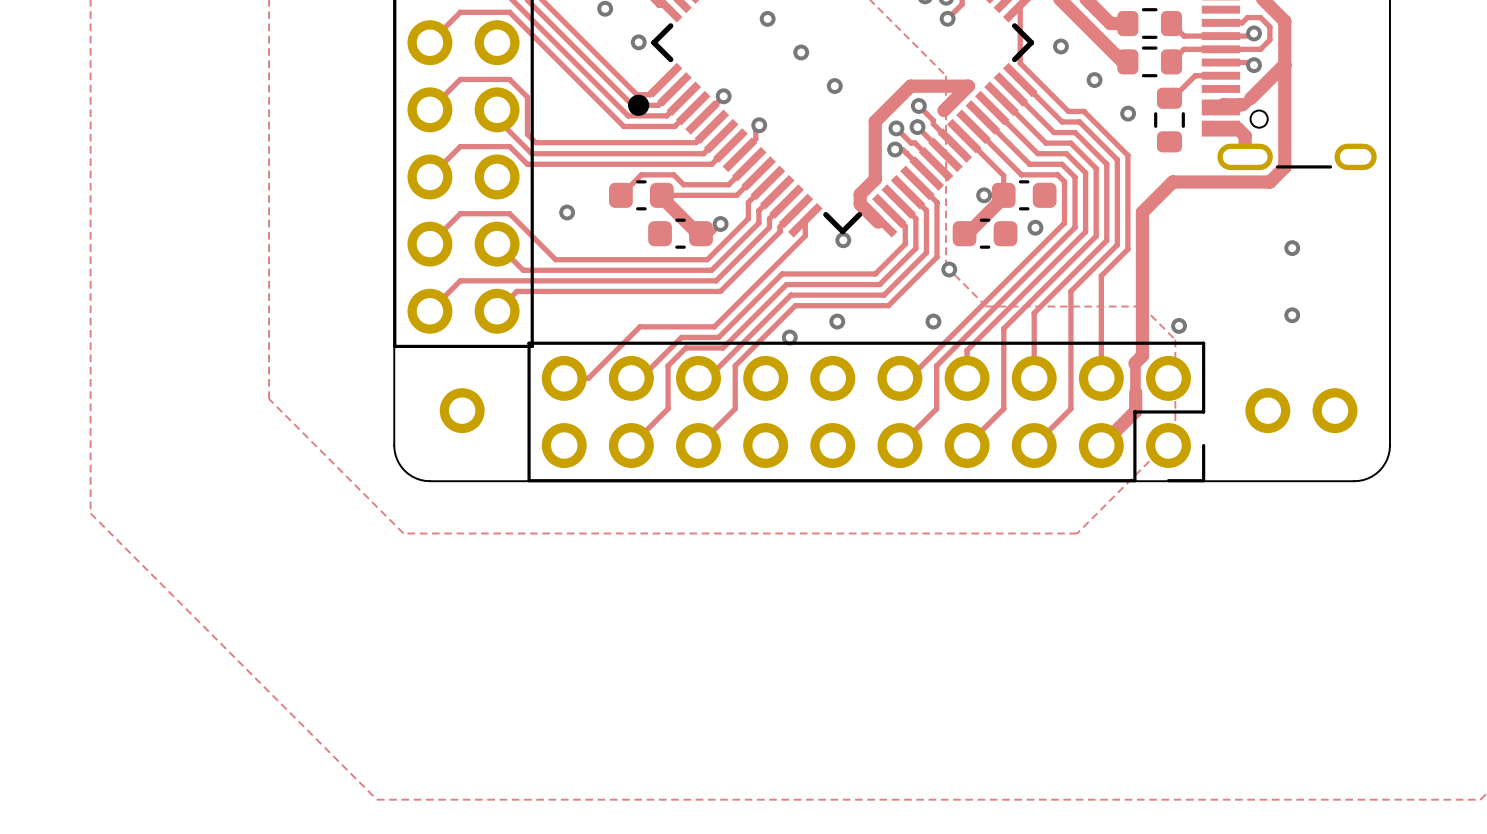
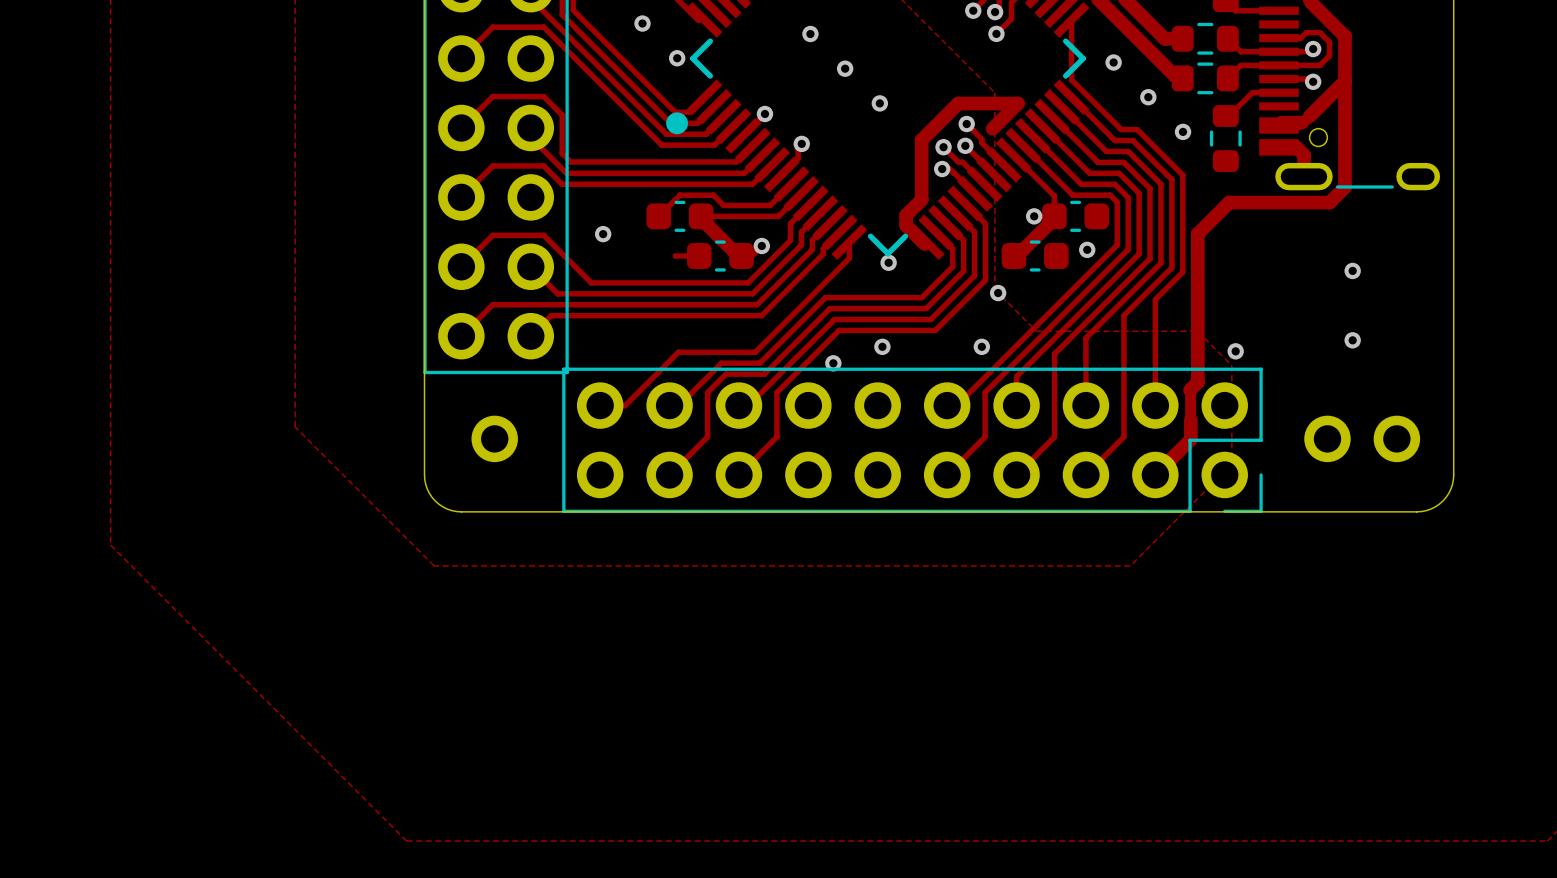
track: none -> (675, 256) (699, 256)

